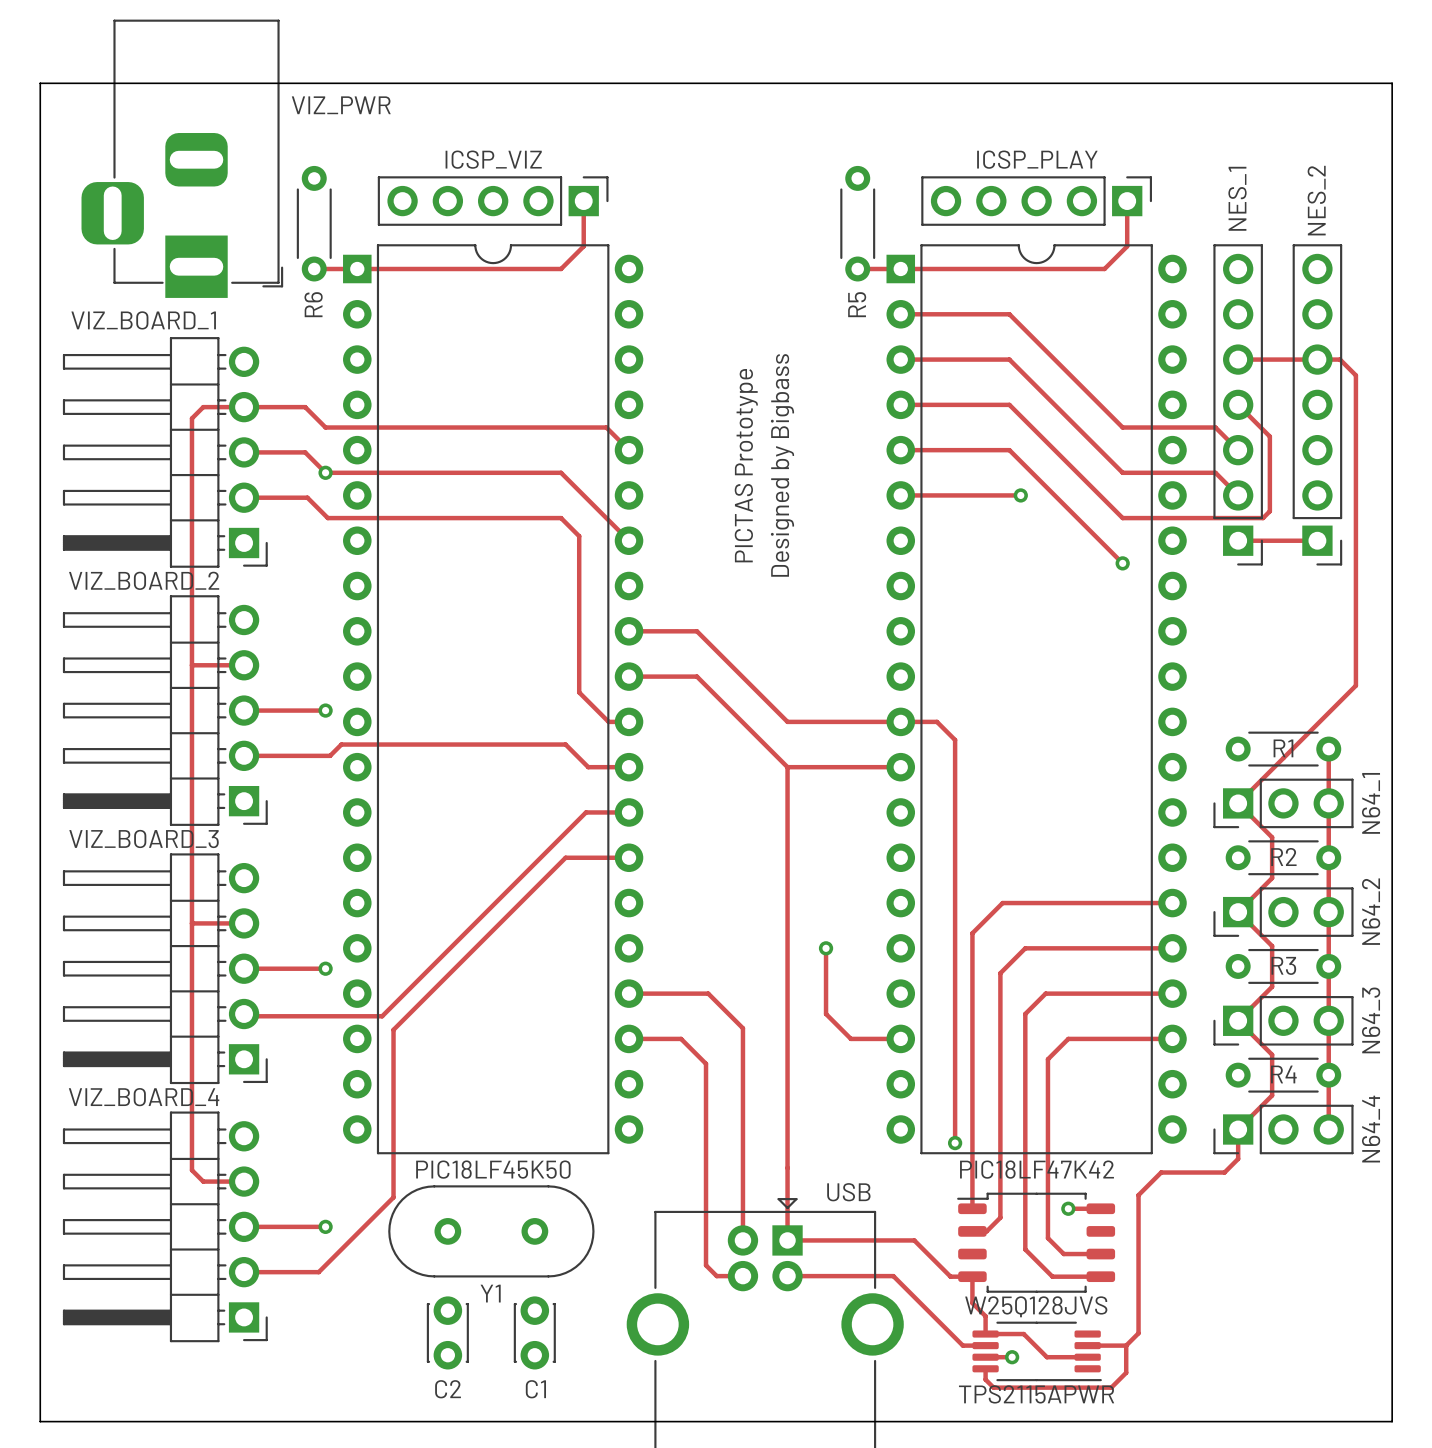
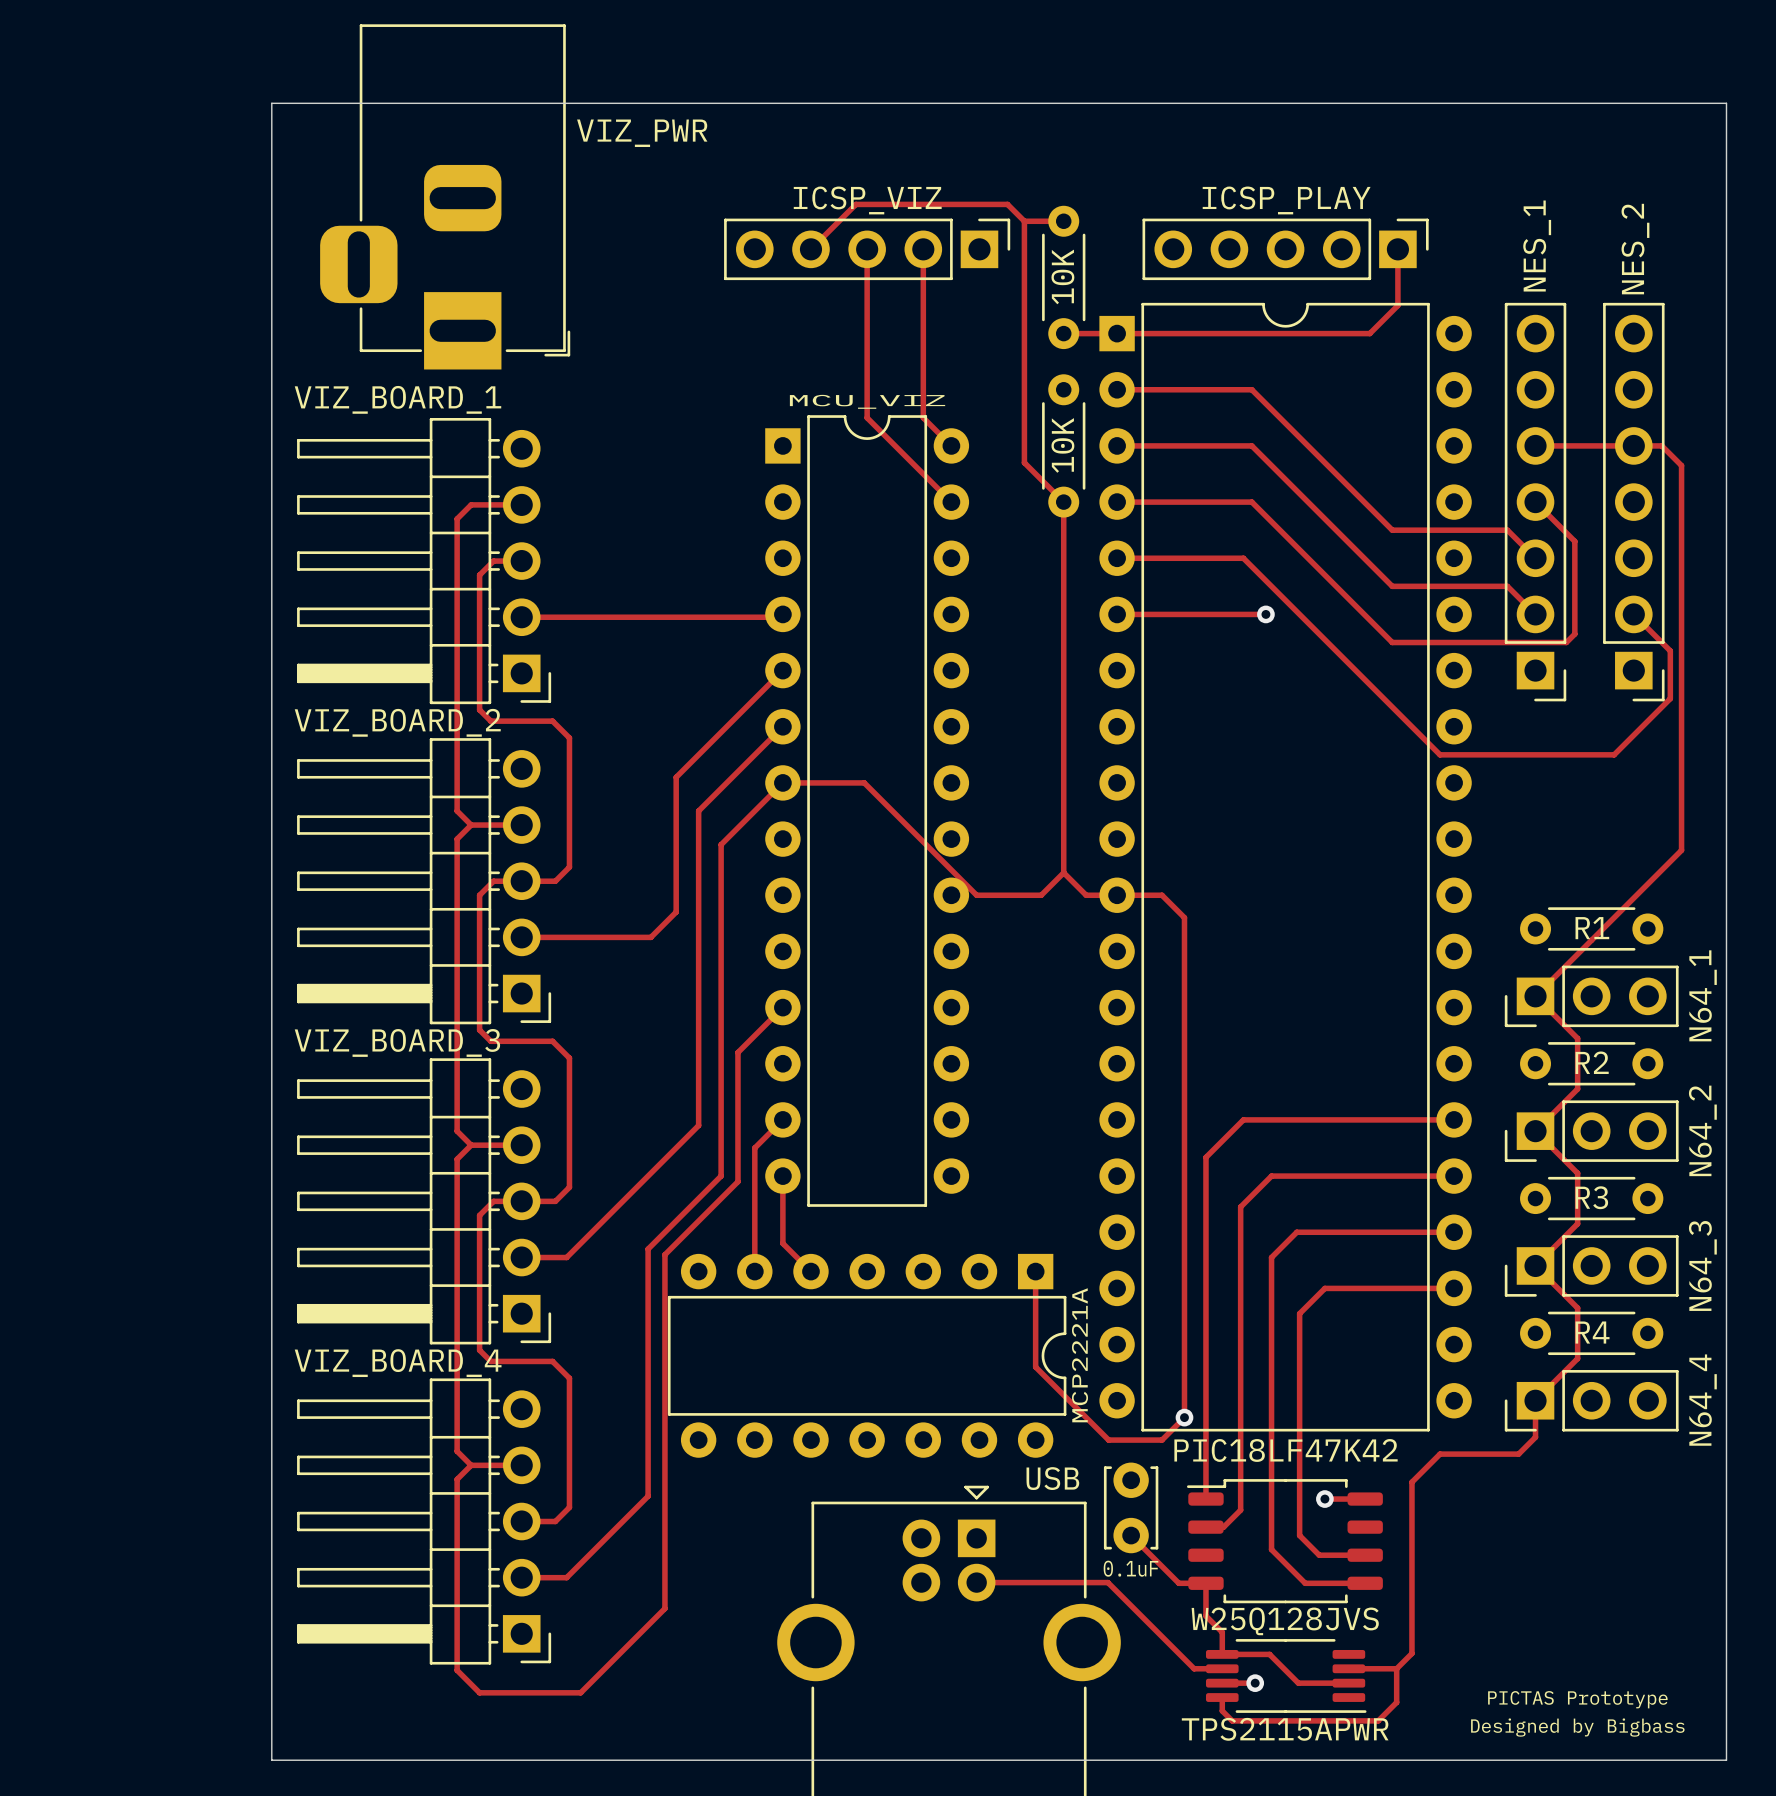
board edge: (219, 83) (40, 83) (40, 1421) (1392, 1421) (1392, 1419) -> (271, 103) (271, 1760) (1726, 1760)
VIZ_PWR position: (182, 158) -> (445, 196)
track: none -> (1024, 221) (1007, 204) (855, 204) (810, 249)
track: none -> (1024, 221) (1024, 462) (1063, 502) (1063, 872)
track: none -> (1024, 221) (1063, 221)
ICSP_VIZ position: (493, 201) -> (867, 249)
track: (583, 201) (583, 246) (561, 268) (314, 268) -> none
track: none -> (867, 249) (867, 417) (951, 502)
track: none -> (923, 249) (923, 417) (951, 445)
R6: (314, 223) -> none
R5 name: R5 (857, 304) -> 10K (1062, 445)
10K: none -> (1063, 445)
track: none -> (521, 504) (471, 504) (457, 518) (457, 811) (471, 825)
track: (629, 450) (606, 427) (325, 427) (305, 407) (203, 407) (191, 418) (191, 1170) (203, 1181) (244, 1181) -> none
track: (1002, 450) (1009, 450) (1122, 563) -> (1243, 558) (1440, 754) (1614, 754) (1670, 698) (1670, 650) (1633, 614)
VIZ_BOARD_1 position: (165, 452) -> (424, 561)
track: (244, 452) (305, 452) (325, 472) (561, 472) (629, 540) -> none
track: none -> (521, 561) (493, 561) (479, 575) (479, 709) (490, 721) (552, 721) (569, 737) (569, 867) (555, 881) (493, 881) (479, 895) (479, 1030) (490, 1041) (552, 1041) (569, 1058) (569, 1187) (555, 1201) (493, 1201) (479, 1215) (479, 1350) (490, 1361) (552, 1361) (569, 1378) (569, 1507) (555, 1521) (521, 1521)
text: PICTAS Prototype (746, 465) -> none
text: Designed by Bigbass (782, 465) -> none
via: (325, 472) -> none
track: none -> (782, 614) (780, 617) (521, 617)
track: (244, 497) (307, 497) (327, 518) (561, 518) (579, 536) (579, 692) (608, 721) (629, 721) -> none
track: none -> (782, 670) (676, 777) (676, 912) (650, 937) (521, 937)
track: (1238, 540) (1317, 540) -> none
via: (1122, 563) -> none
track: none -> (782, 726) (698, 811) (698, 1125) (566, 1257) (521, 1257)
track: none -> (782, 782) (721, 844) (721, 1176) (648, 1249) (648, 1496) (566, 1577) (521, 1577)
MCU_VIZ: none -> (867, 811)
track: (191, 665) (244, 665) -> none
track: none -> (471, 825) (521, 825)
track: none -> (471, 825) (457, 839) (457, 1131) (471, 1145)
track: (629, 676) (696, 676) (787, 767) -> none
PIC18LF45K50: (493, 699) -> none
track: none -> (1063, 872) (1041, 895)
VIZ_BOARD_2 position: (165, 710) -> (424, 881)
track: (244, 710) (325, 710) -> none
via: (325, 710) -> none
track: (839, 721) (875, 721) -> (1063, 872) (1086, 895)
track: (1328, 749) (1328, 1129) -> none
track: (244, 755) (330, 755) (341, 744) (565, 744) (588, 767) (629, 767) -> none
track: (787, 767) (900, 767) -> none
track: (787, 767) (787, 1240) (914, 1240) -> none
track: (629, 812) (586, 812) (382, 1016) (246, 1016) (244, 1014) -> none
track: none -> (782, 1007) (737, 1052) (737, 1181) (664, 1254) (664, 1608) (580, 1692) (479, 1692) (457, 1670) (457, 1479) (471, 1465)
track: (629, 857) (565, 857) (393, 1029) (393, 1197) (318, 1272) (244, 1272) -> none
track: none -> (782, 1119) (754, 1148) (754, 1271)
track: (191, 923) (244, 923) -> none
track: none -> (471, 1145) (521, 1145)
track: none -> (471, 1145) (457, 1159) (457, 1451) (471, 1465)
track: none -> (782, 1176) (782, 1243) (810, 1271)
track: (826, 948) (826, 1014) (850, 1038) (900, 1038) -> none
via: (826, 948) -> none
VIZ_BOARD_3 position: (165, 968) -> (424, 1201)
track: (244, 968) (325, 968) -> none
via: (325, 968) -> none
track: (629, 993) (708, 993) (742, 1028) (742, 1240) -> none
track: none -> (1035, 1271) (1035, 1367) (1108, 1440) (1162, 1440) (1184, 1417)
track: (629, 1038) (681, 1038) (706, 1063) (706, 1265) (716, 1276) (742, 1276) -> none
MCP2221A: none -> (867, 1355)
track: none -> (471, 1465) (521, 1465)
0.1uF: none -> (1131, 1507)
VIZ_BOARD_4 position: (165, 1226) -> (424, 1521)
track: (244, 1226) (325, 1226) -> none
via: (325, 1226) -> none
Y1: (491, 1231) -> none
C2: (447, 1332) -> none
C1: (534, 1332) -> none
text: none -> PICTAS Prototype (1577, 1699)
text: none -> Designed by Bigbass (1577, 1727)

